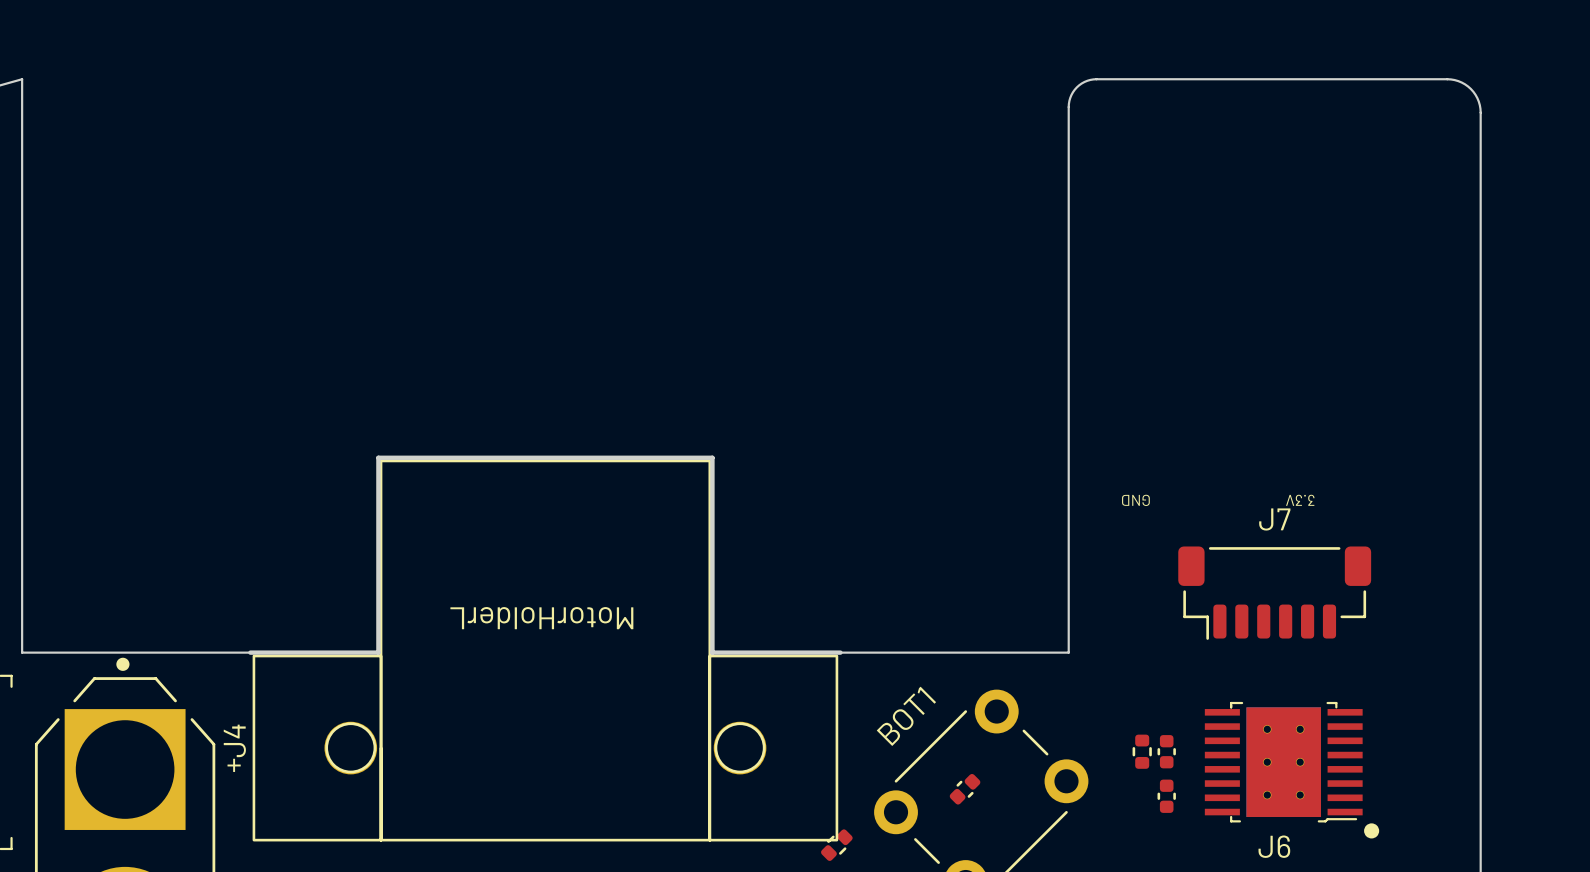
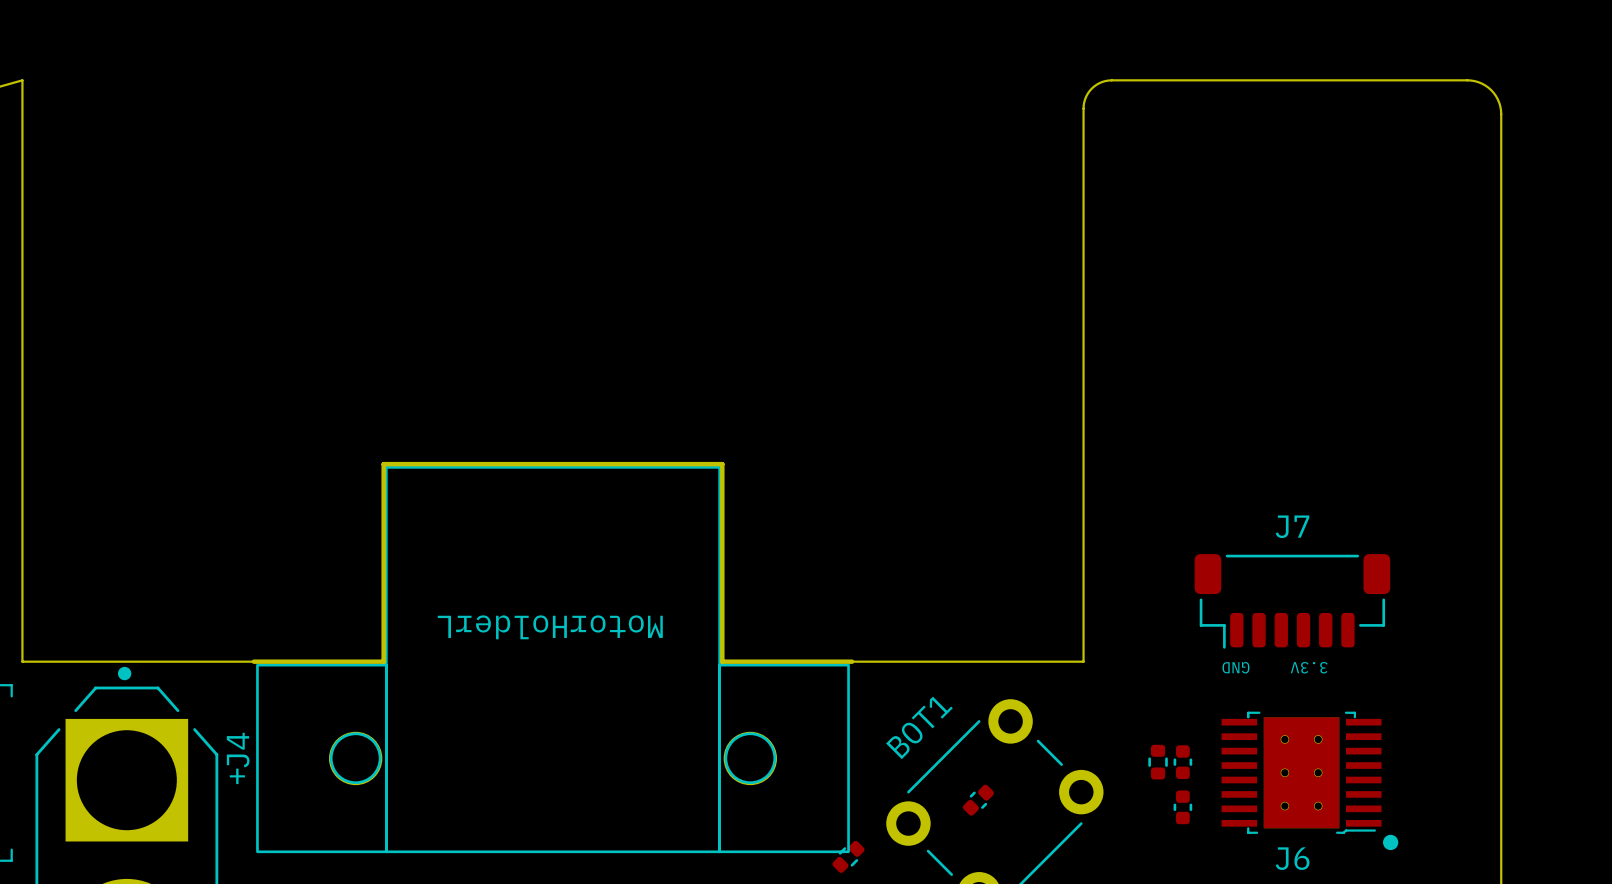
text position: GND (1135, 500) -> GND (1235, 667)
text position: 3.3V (1300, 500) -> 3.3V (1309, 667)

